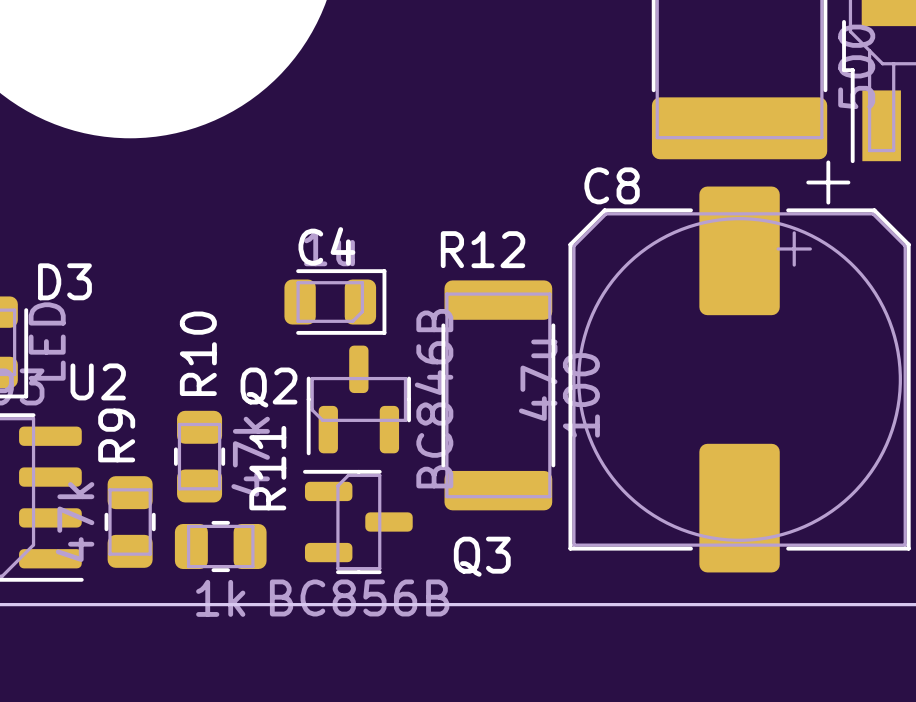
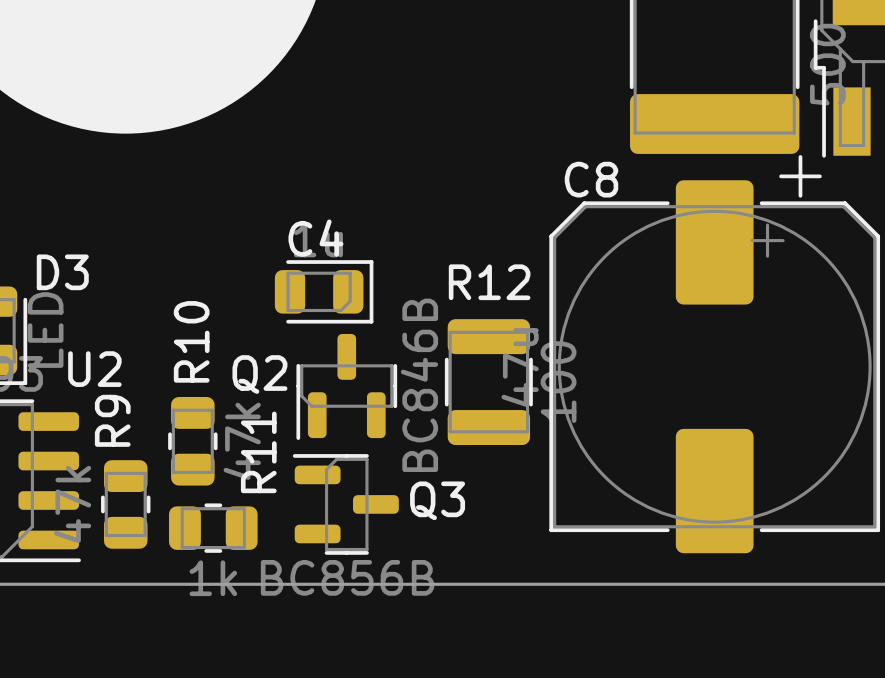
R12 footprint: [441, 280, 556, 511] -> [444, 319, 533, 446]
Q3 name position: Q3 (482, 556) -> Q3 (437, 500)

